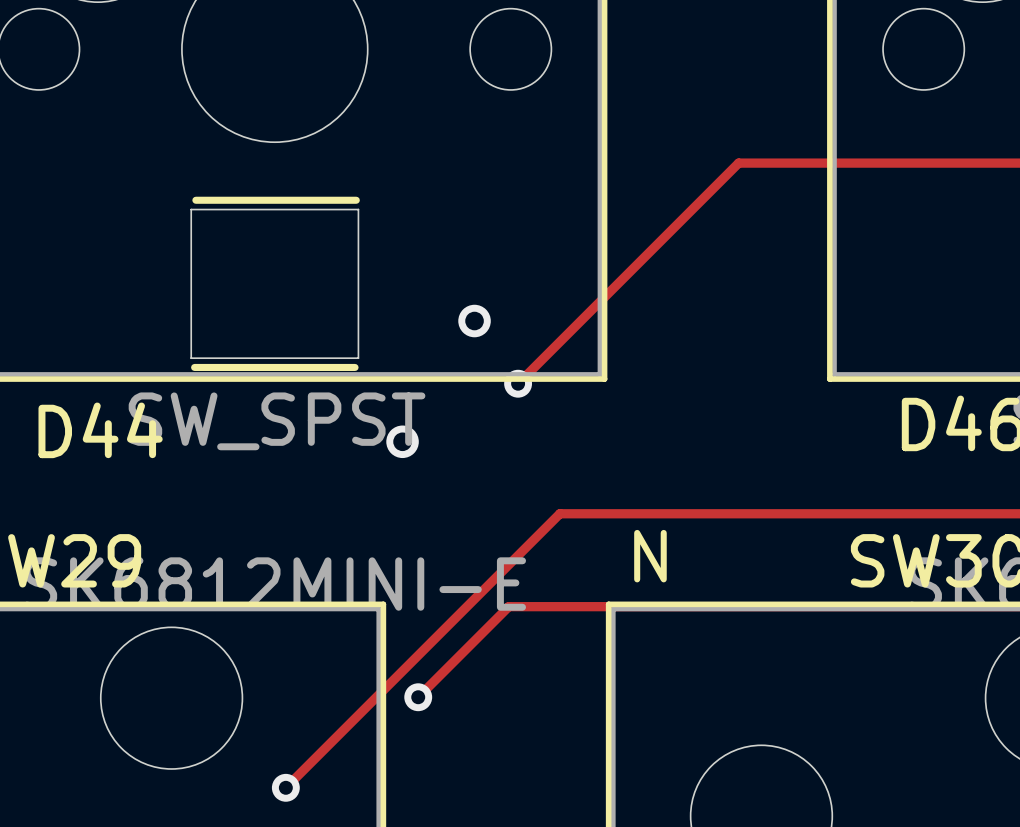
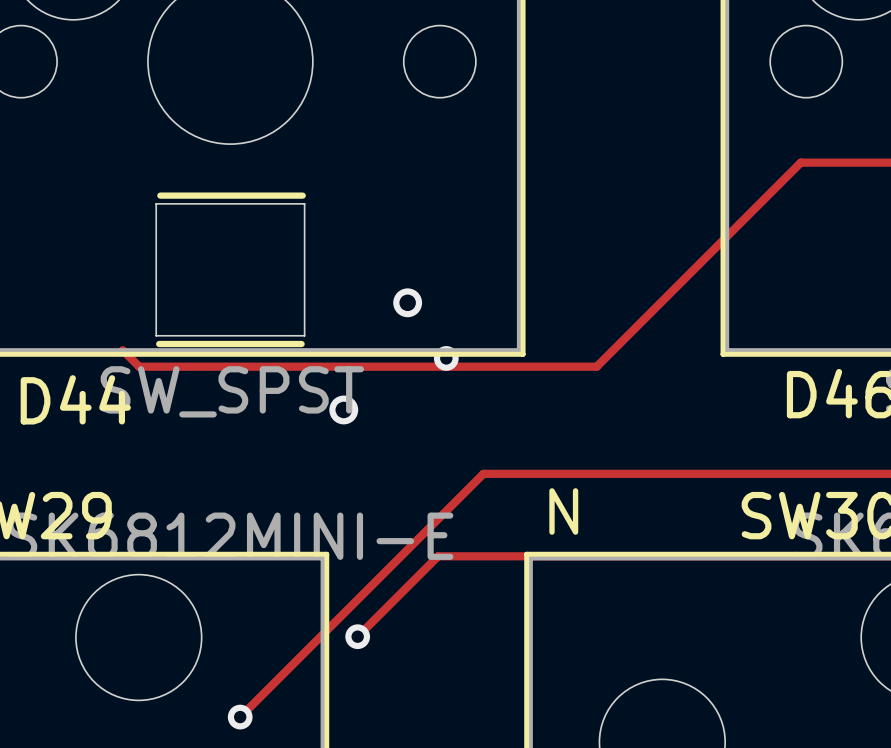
track: (917, 163) (738, 163) (518, 383) -> (800, 162) (596, 366) (139, 366) (122, 350)

